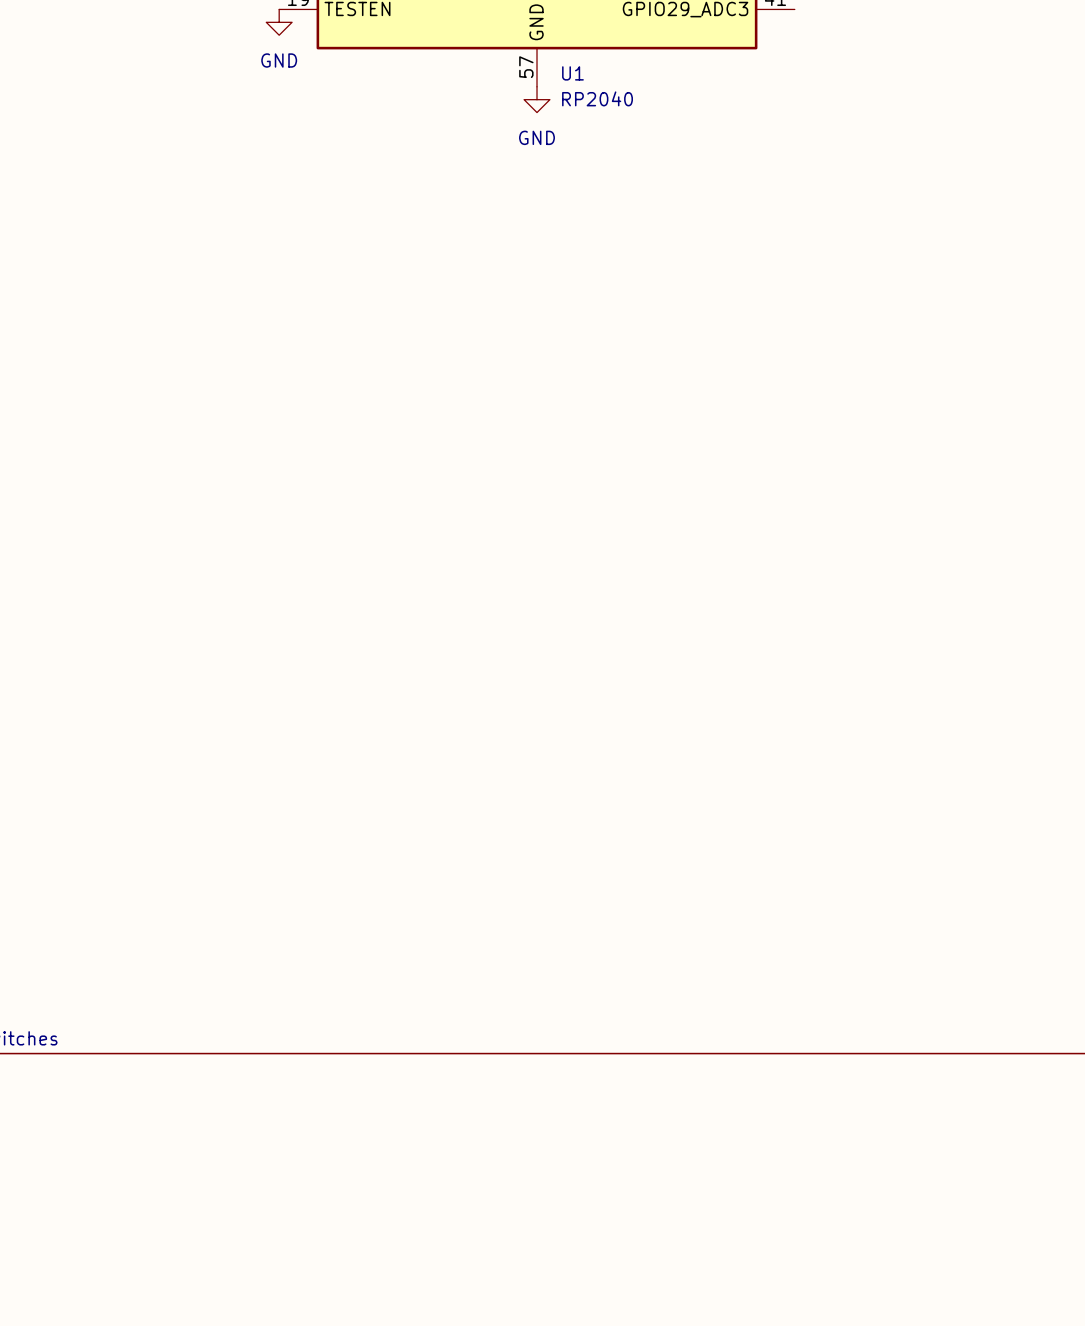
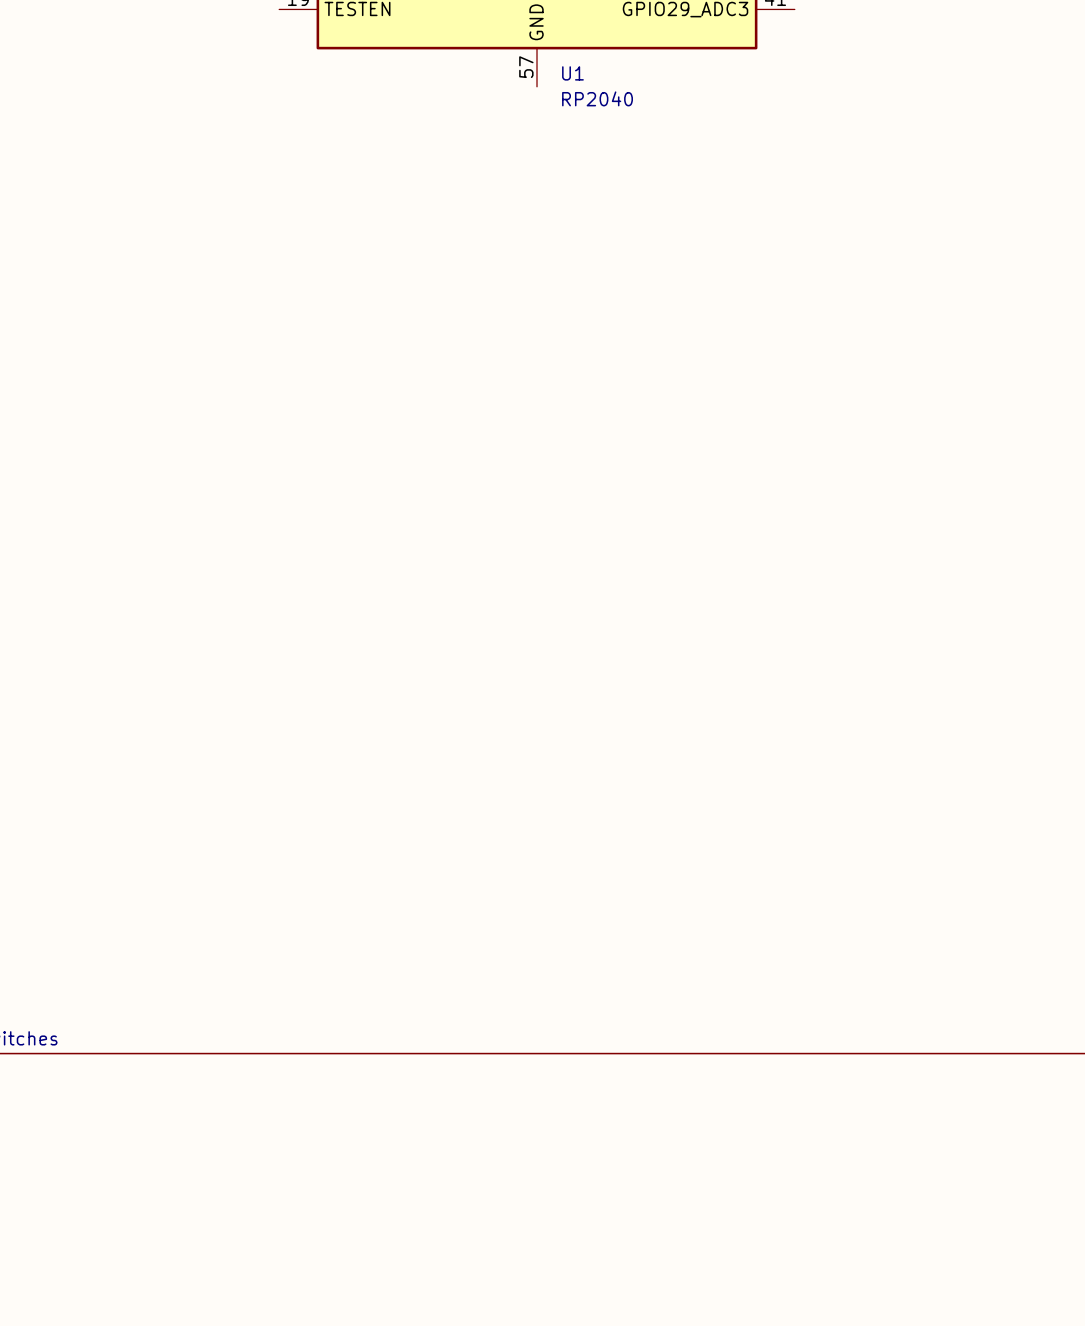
power symbol: GND (279, 22) -> none
power symbol: GND (537, 99) -> none

